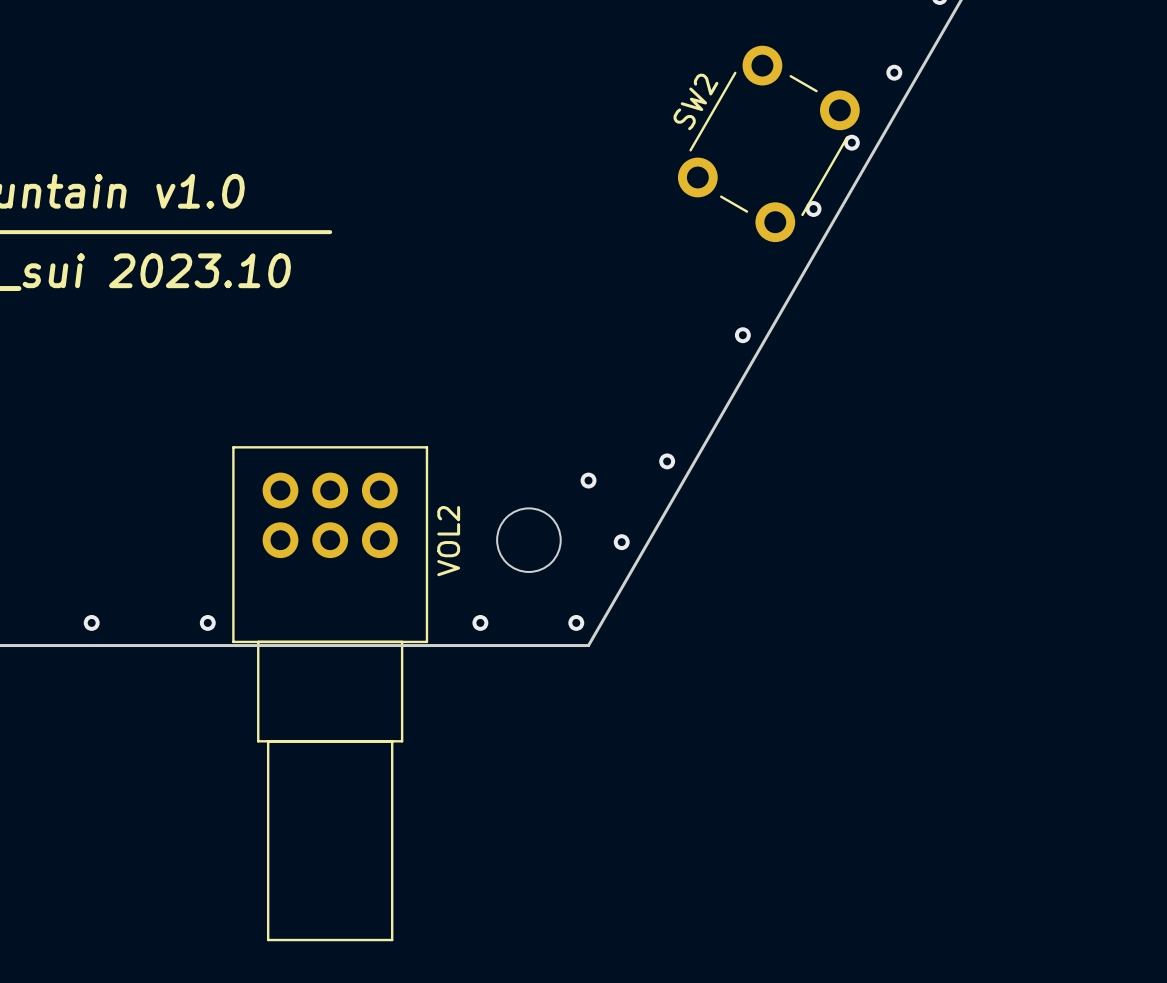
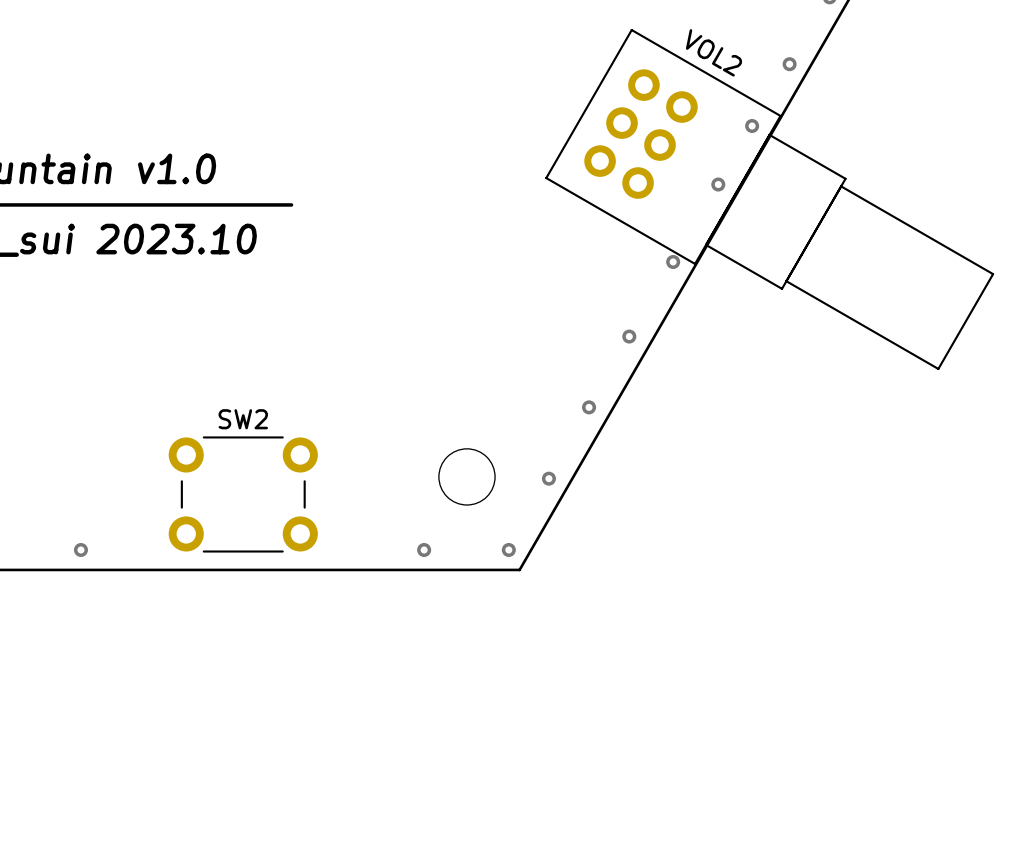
SW2 rotation: 0° (768, 143) -> 60° clockwise (243, 494)
SW2 position: (768, 143) -> (243, 494)
via: none -> (673, 261)
via: (742, 335) -> none
via: none -> (629, 336)
via: (588, 480) -> none
via: (207, 622) -> none
VOL2 rotation: 0° (330, 693) -> 60° counterclockwise (769, 199)
VOL2 position: (330, 693) -> (769, 199)

